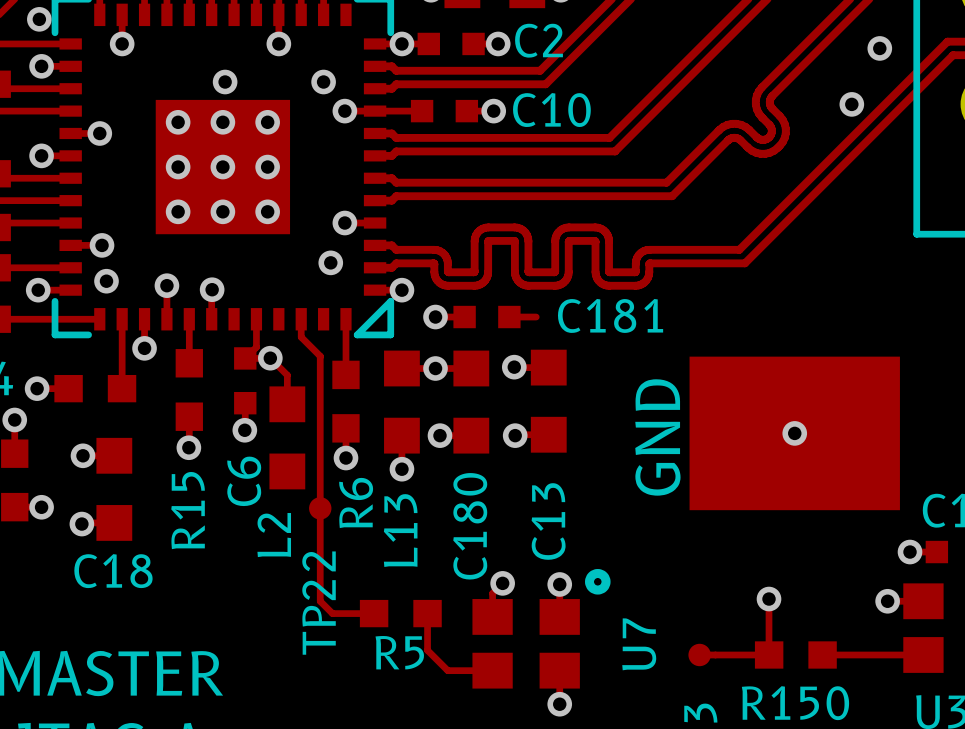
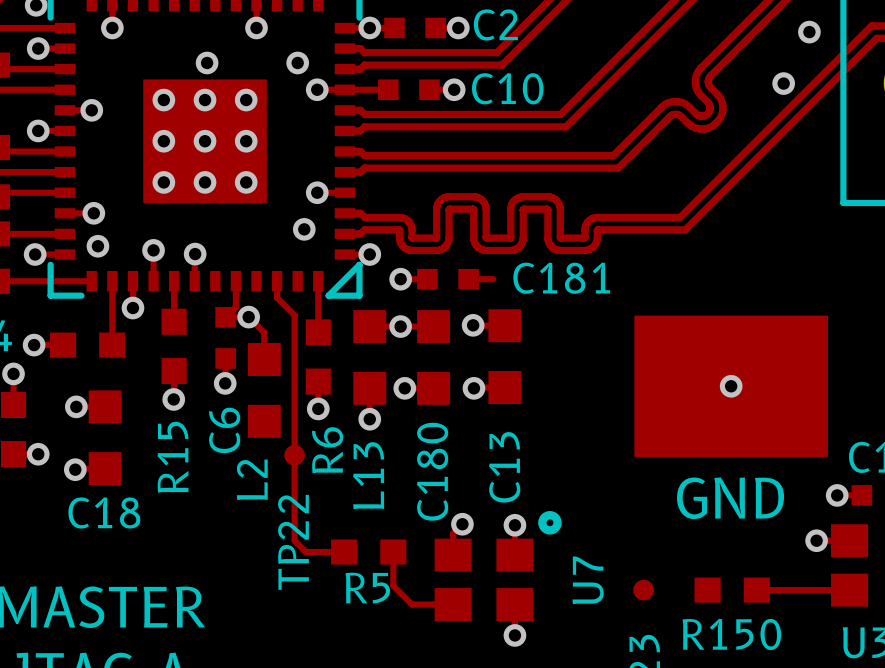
text rotation: 0° (657, 437) -> 90° clockwise (730, 498)
text position: GND (657, 437) -> GND (730, 498)
track: (769, 599) (769, 654) (699, 654) -> none
via: (769, 599) -> none

